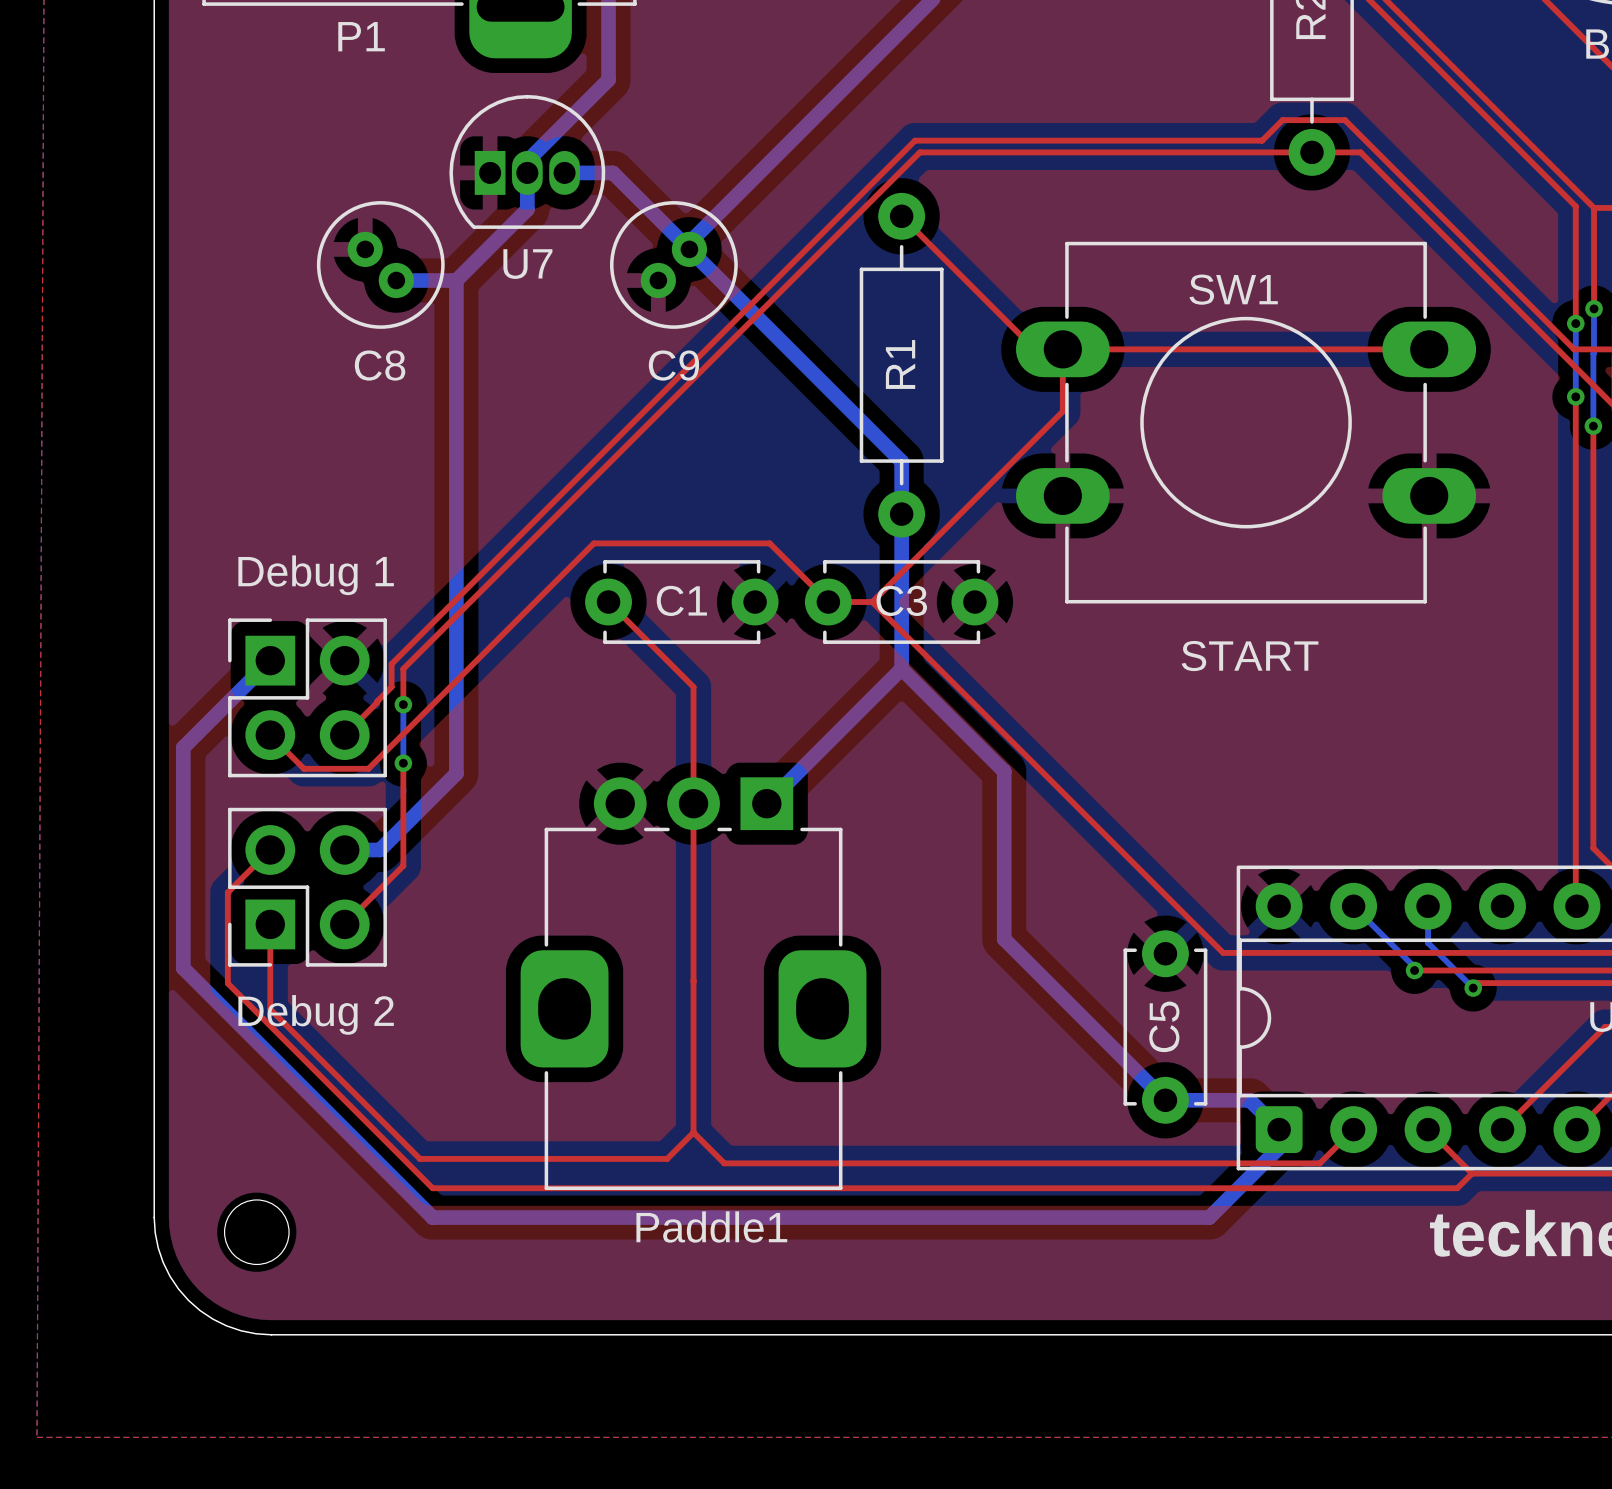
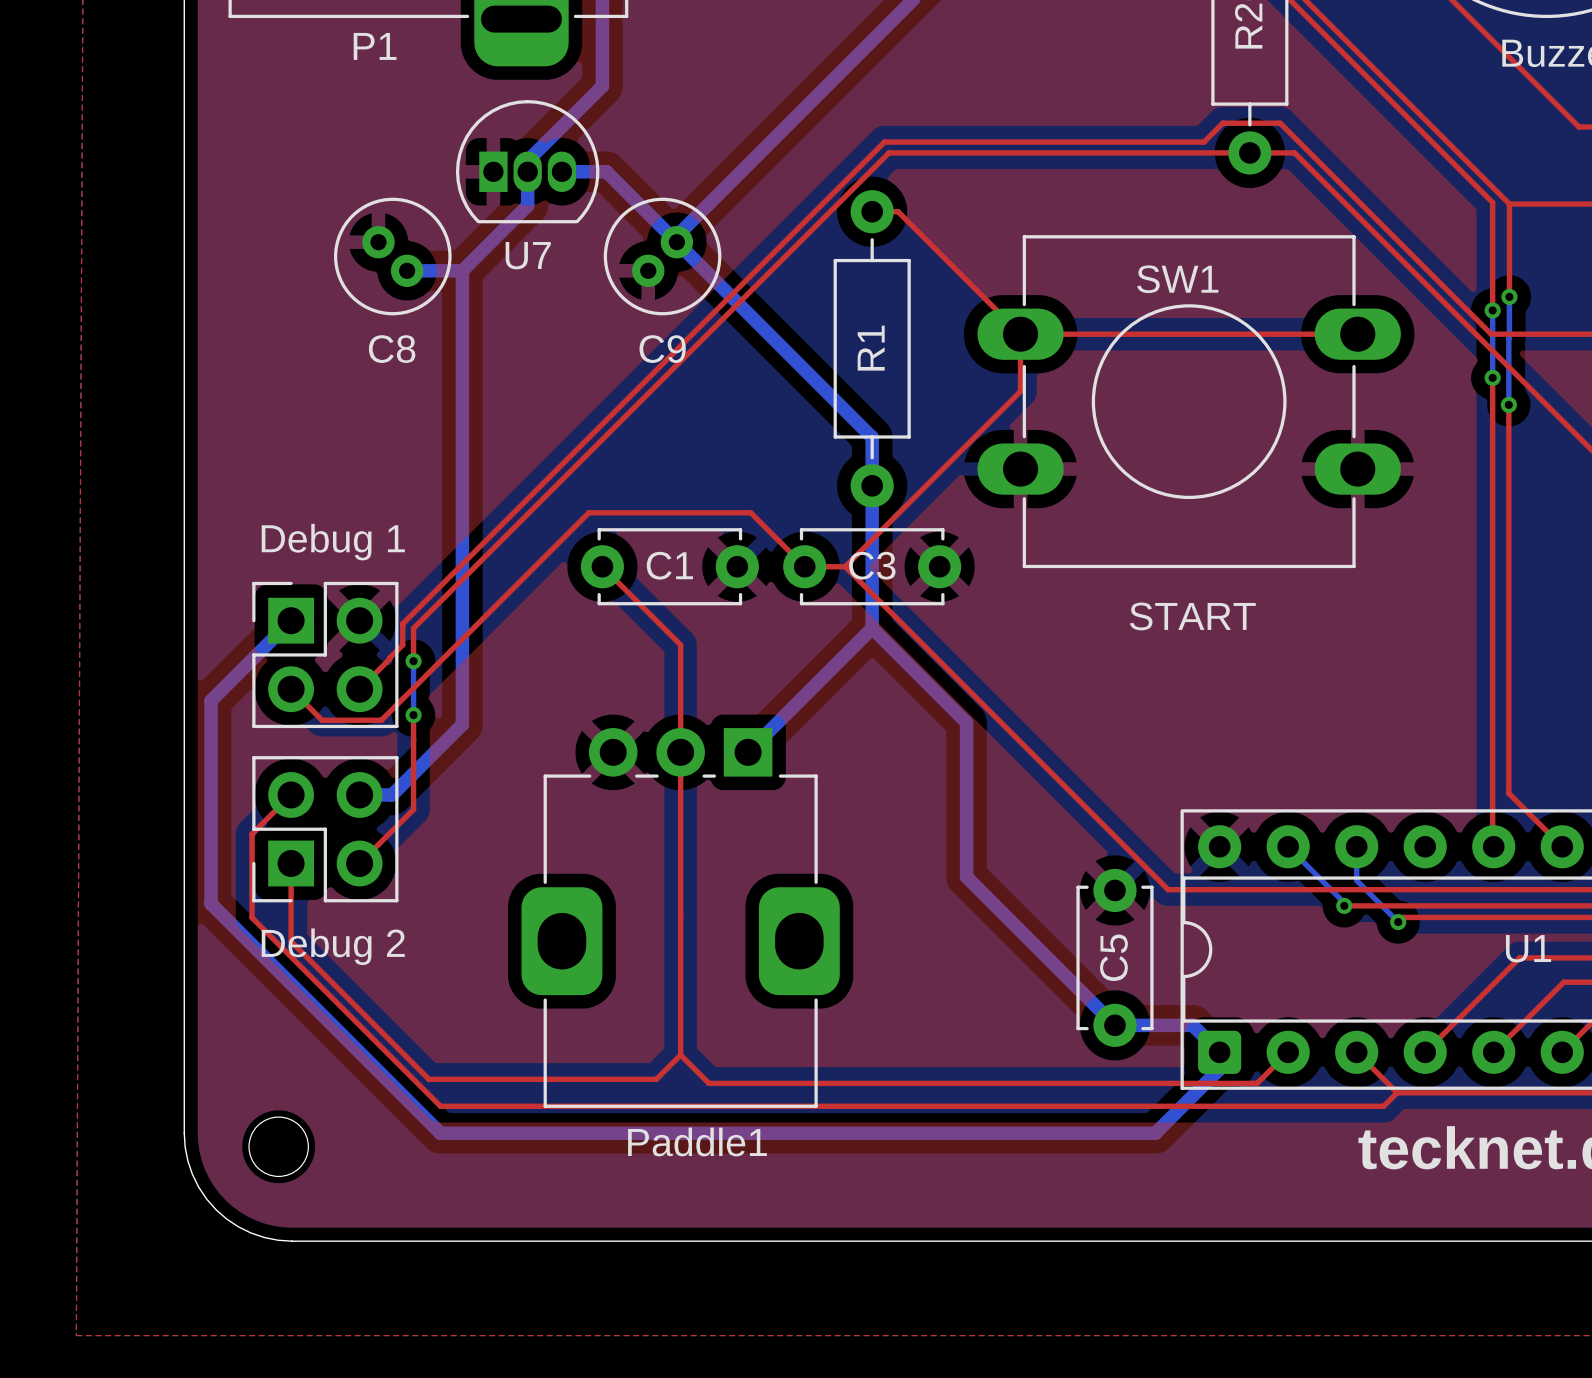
top track: (901, 216) (1034, 349) (1062, 349) -> (872, 211) (898, 211) (1020, 334)

